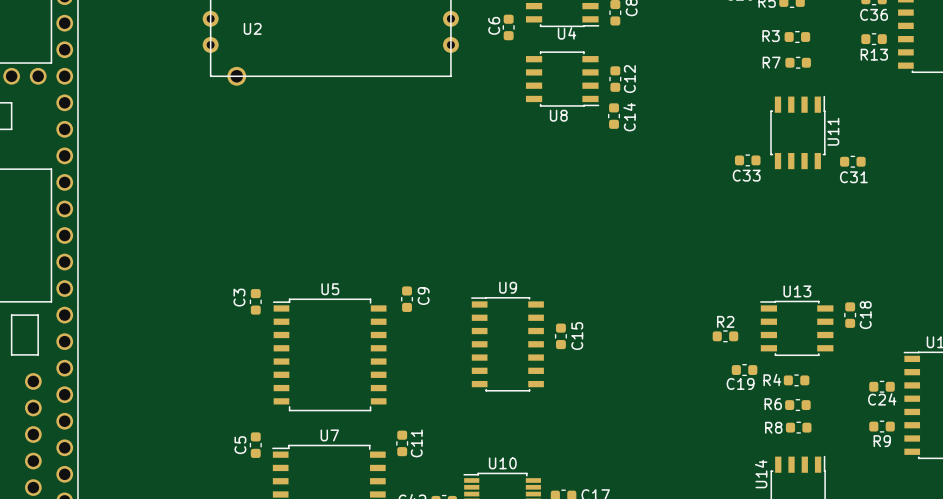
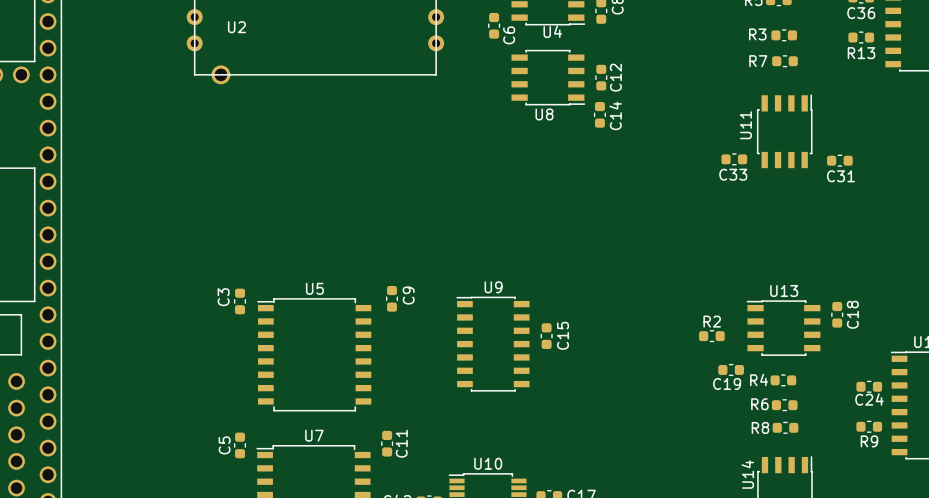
C6 name position: C6 (494, 25) -> C6 (509, 35)
U11 name position: U11 (833, 131) -> U11 (745, 125)

